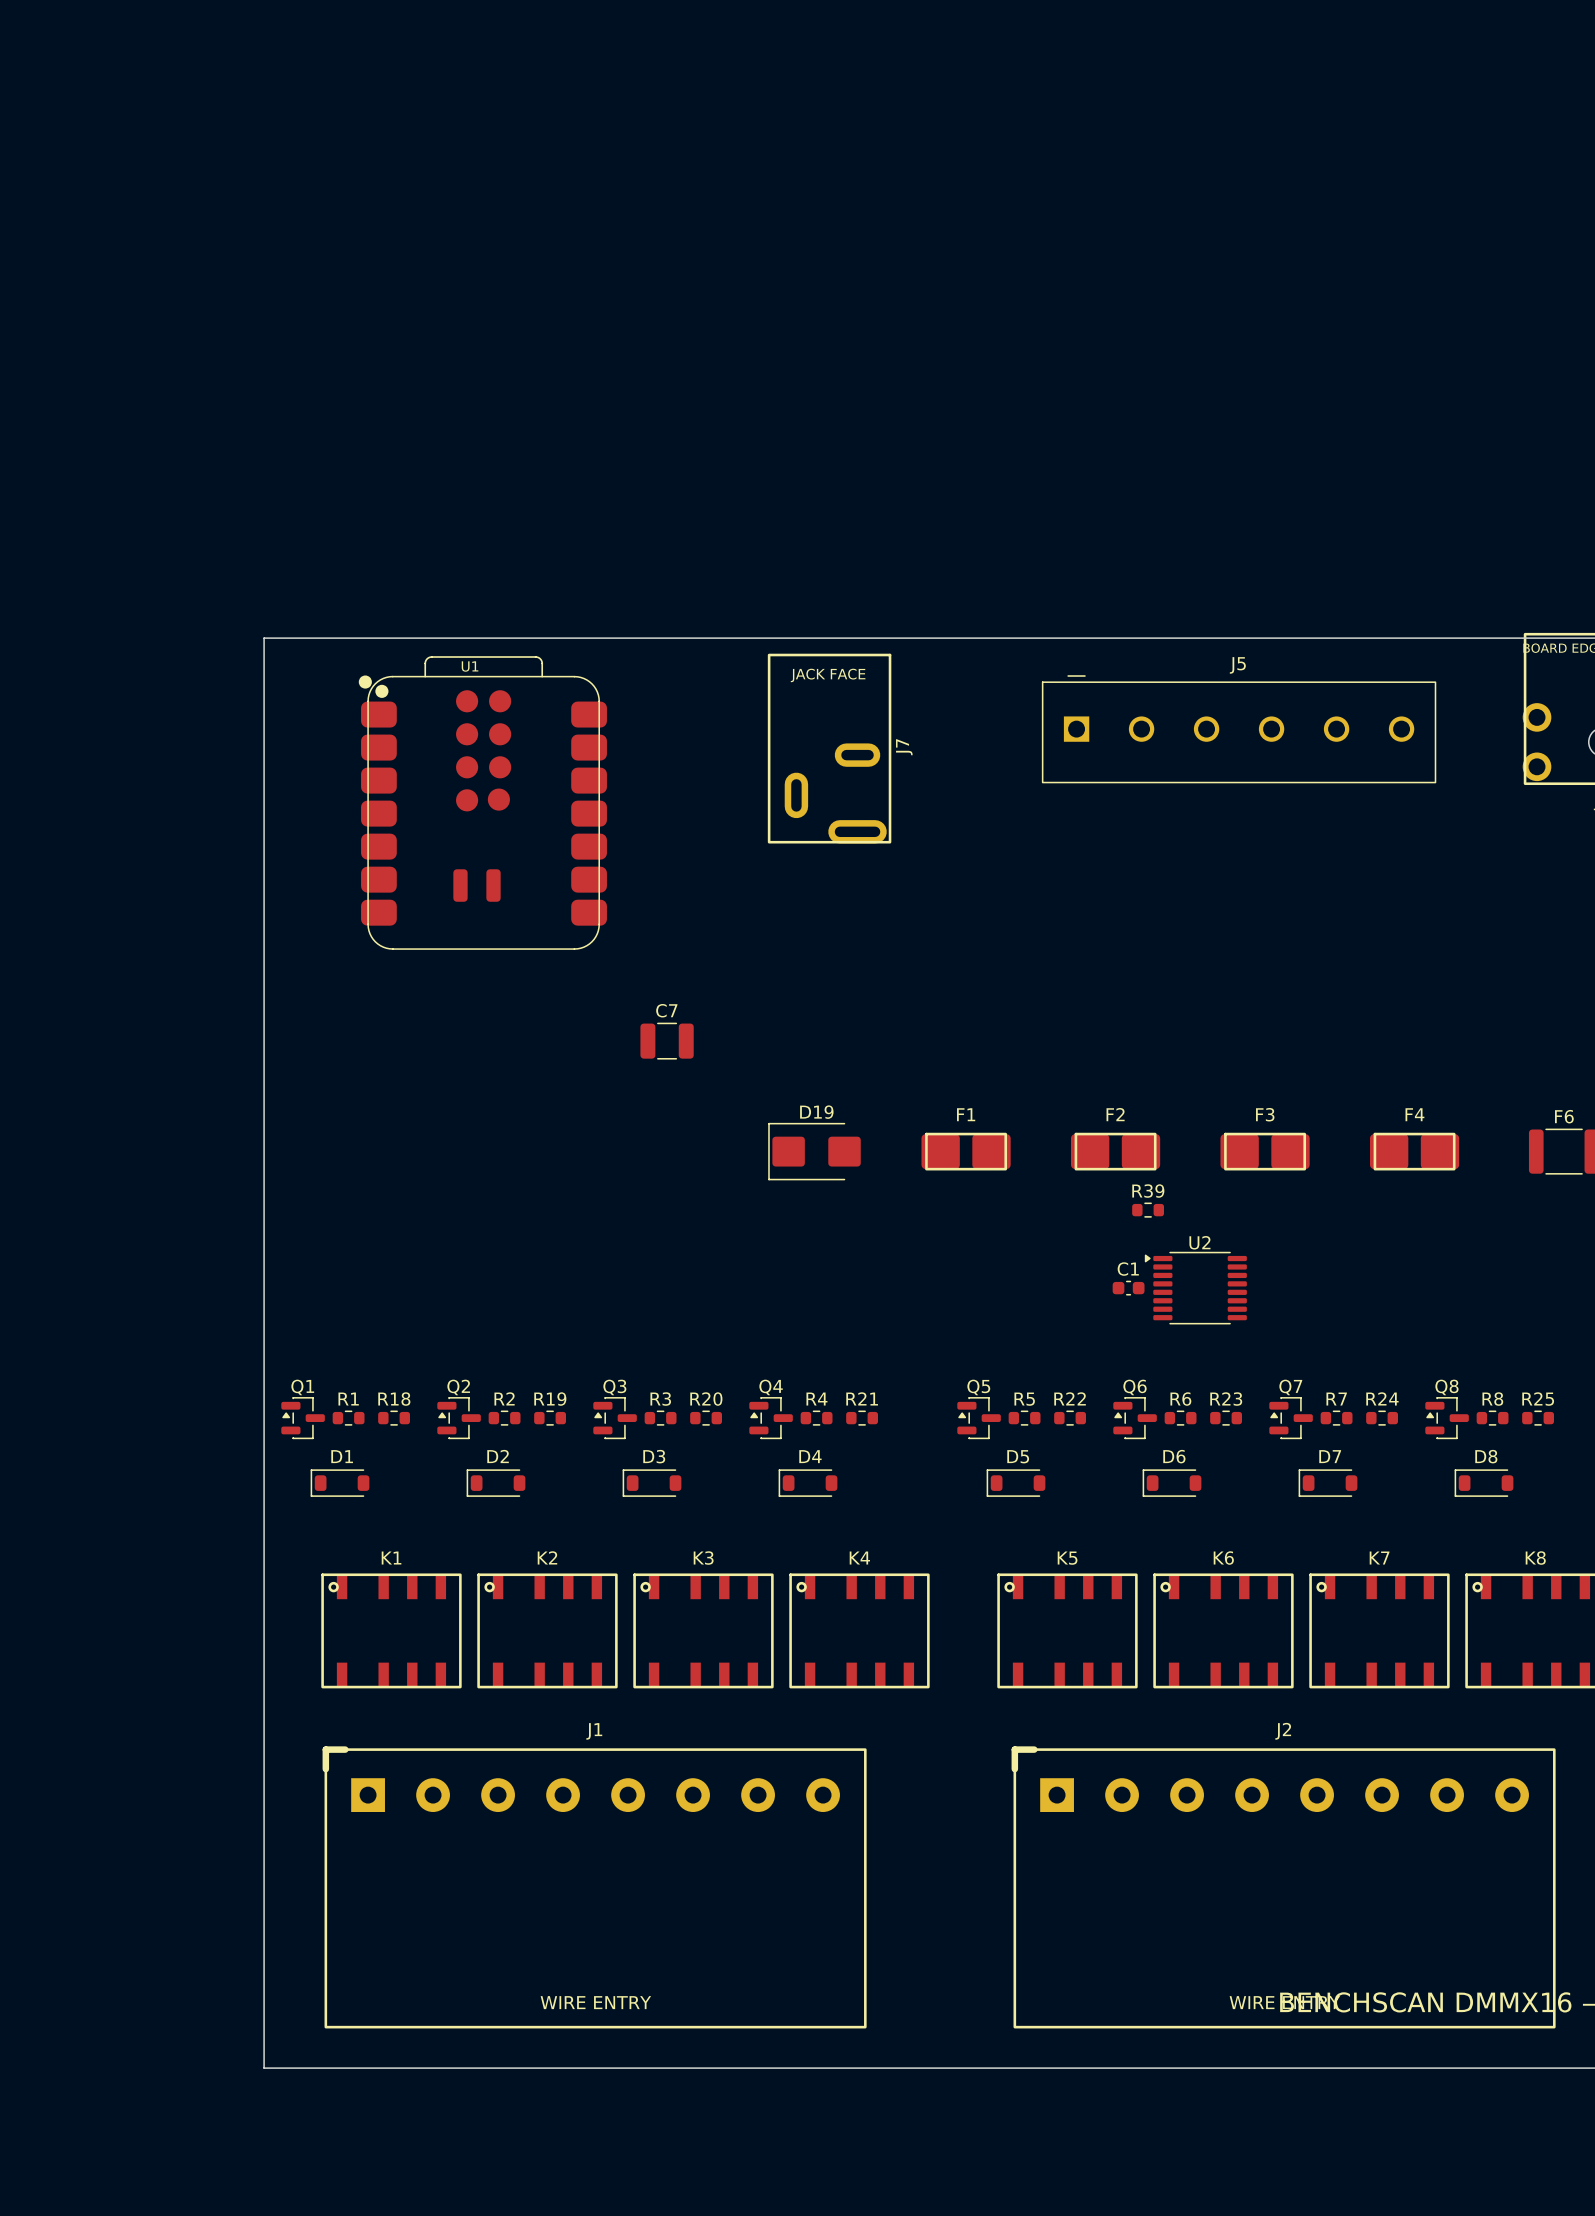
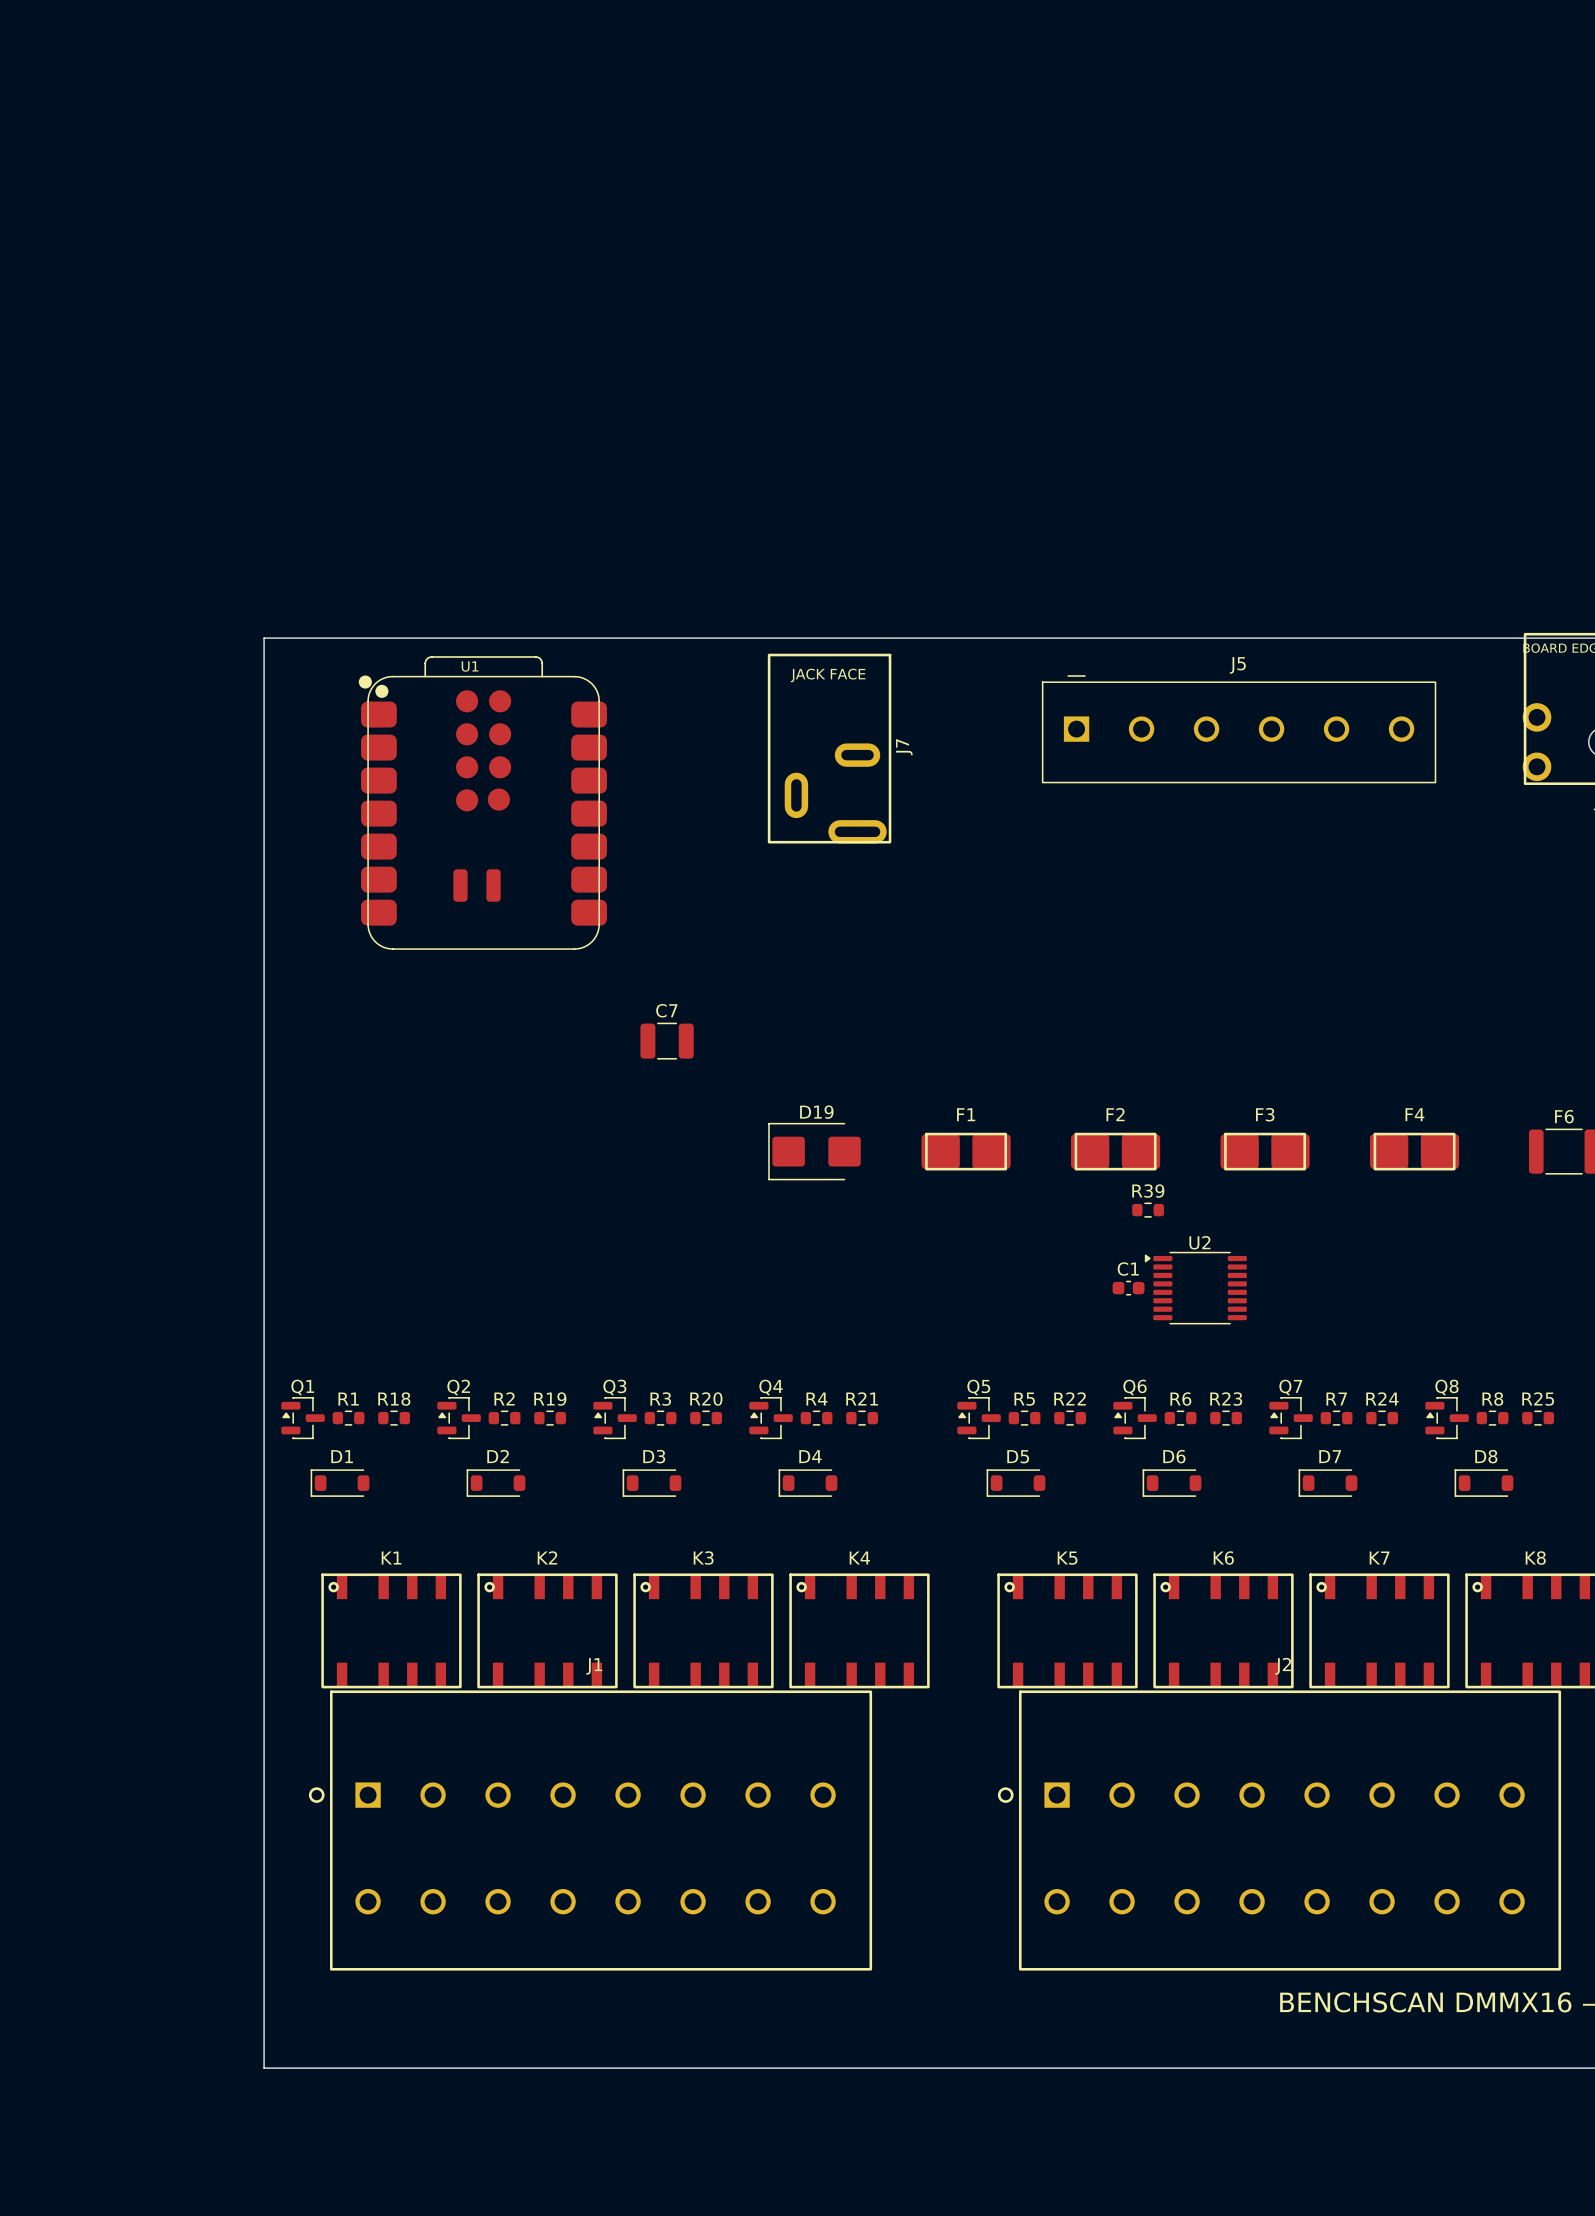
J1 footprint: [322, 1746, 867, 2029] -> [308, 1690, 873, 1971]
J2 footprint: [1011, 1746, 1556, 2029] -> [997, 1690, 1562, 1971]

